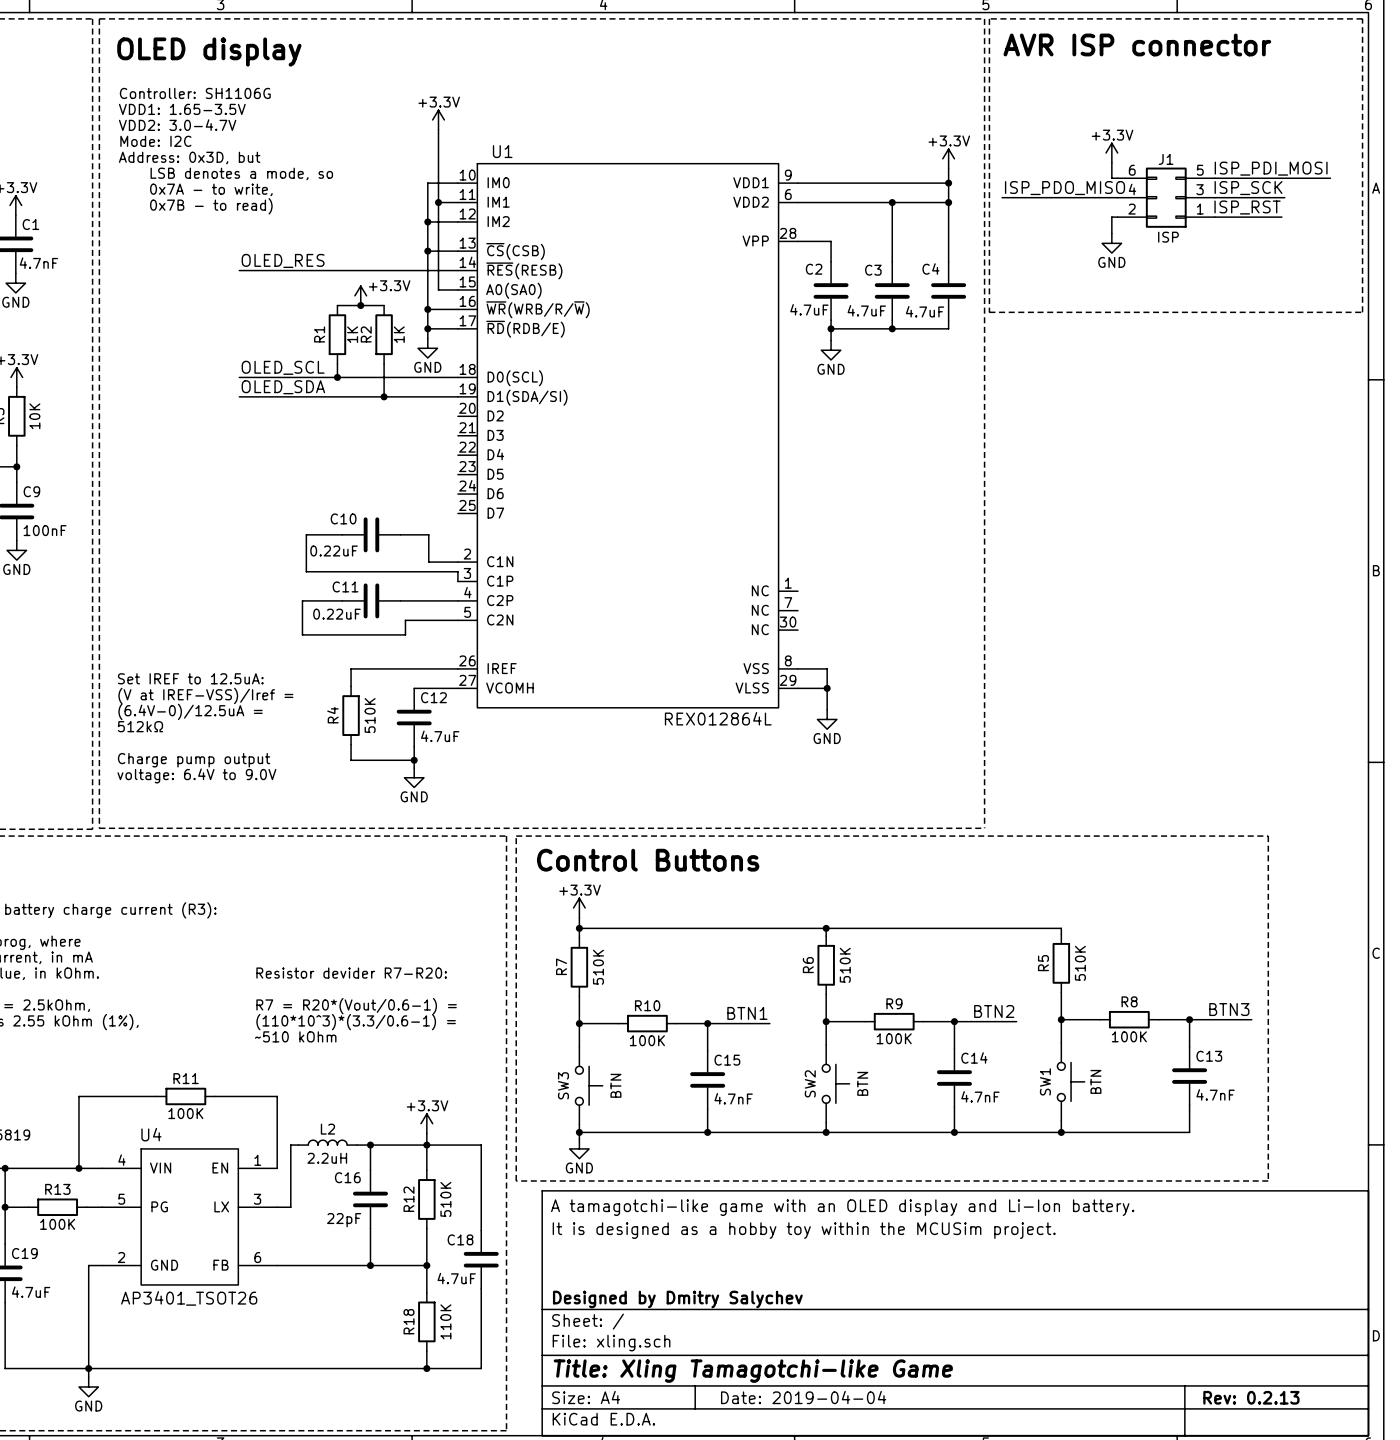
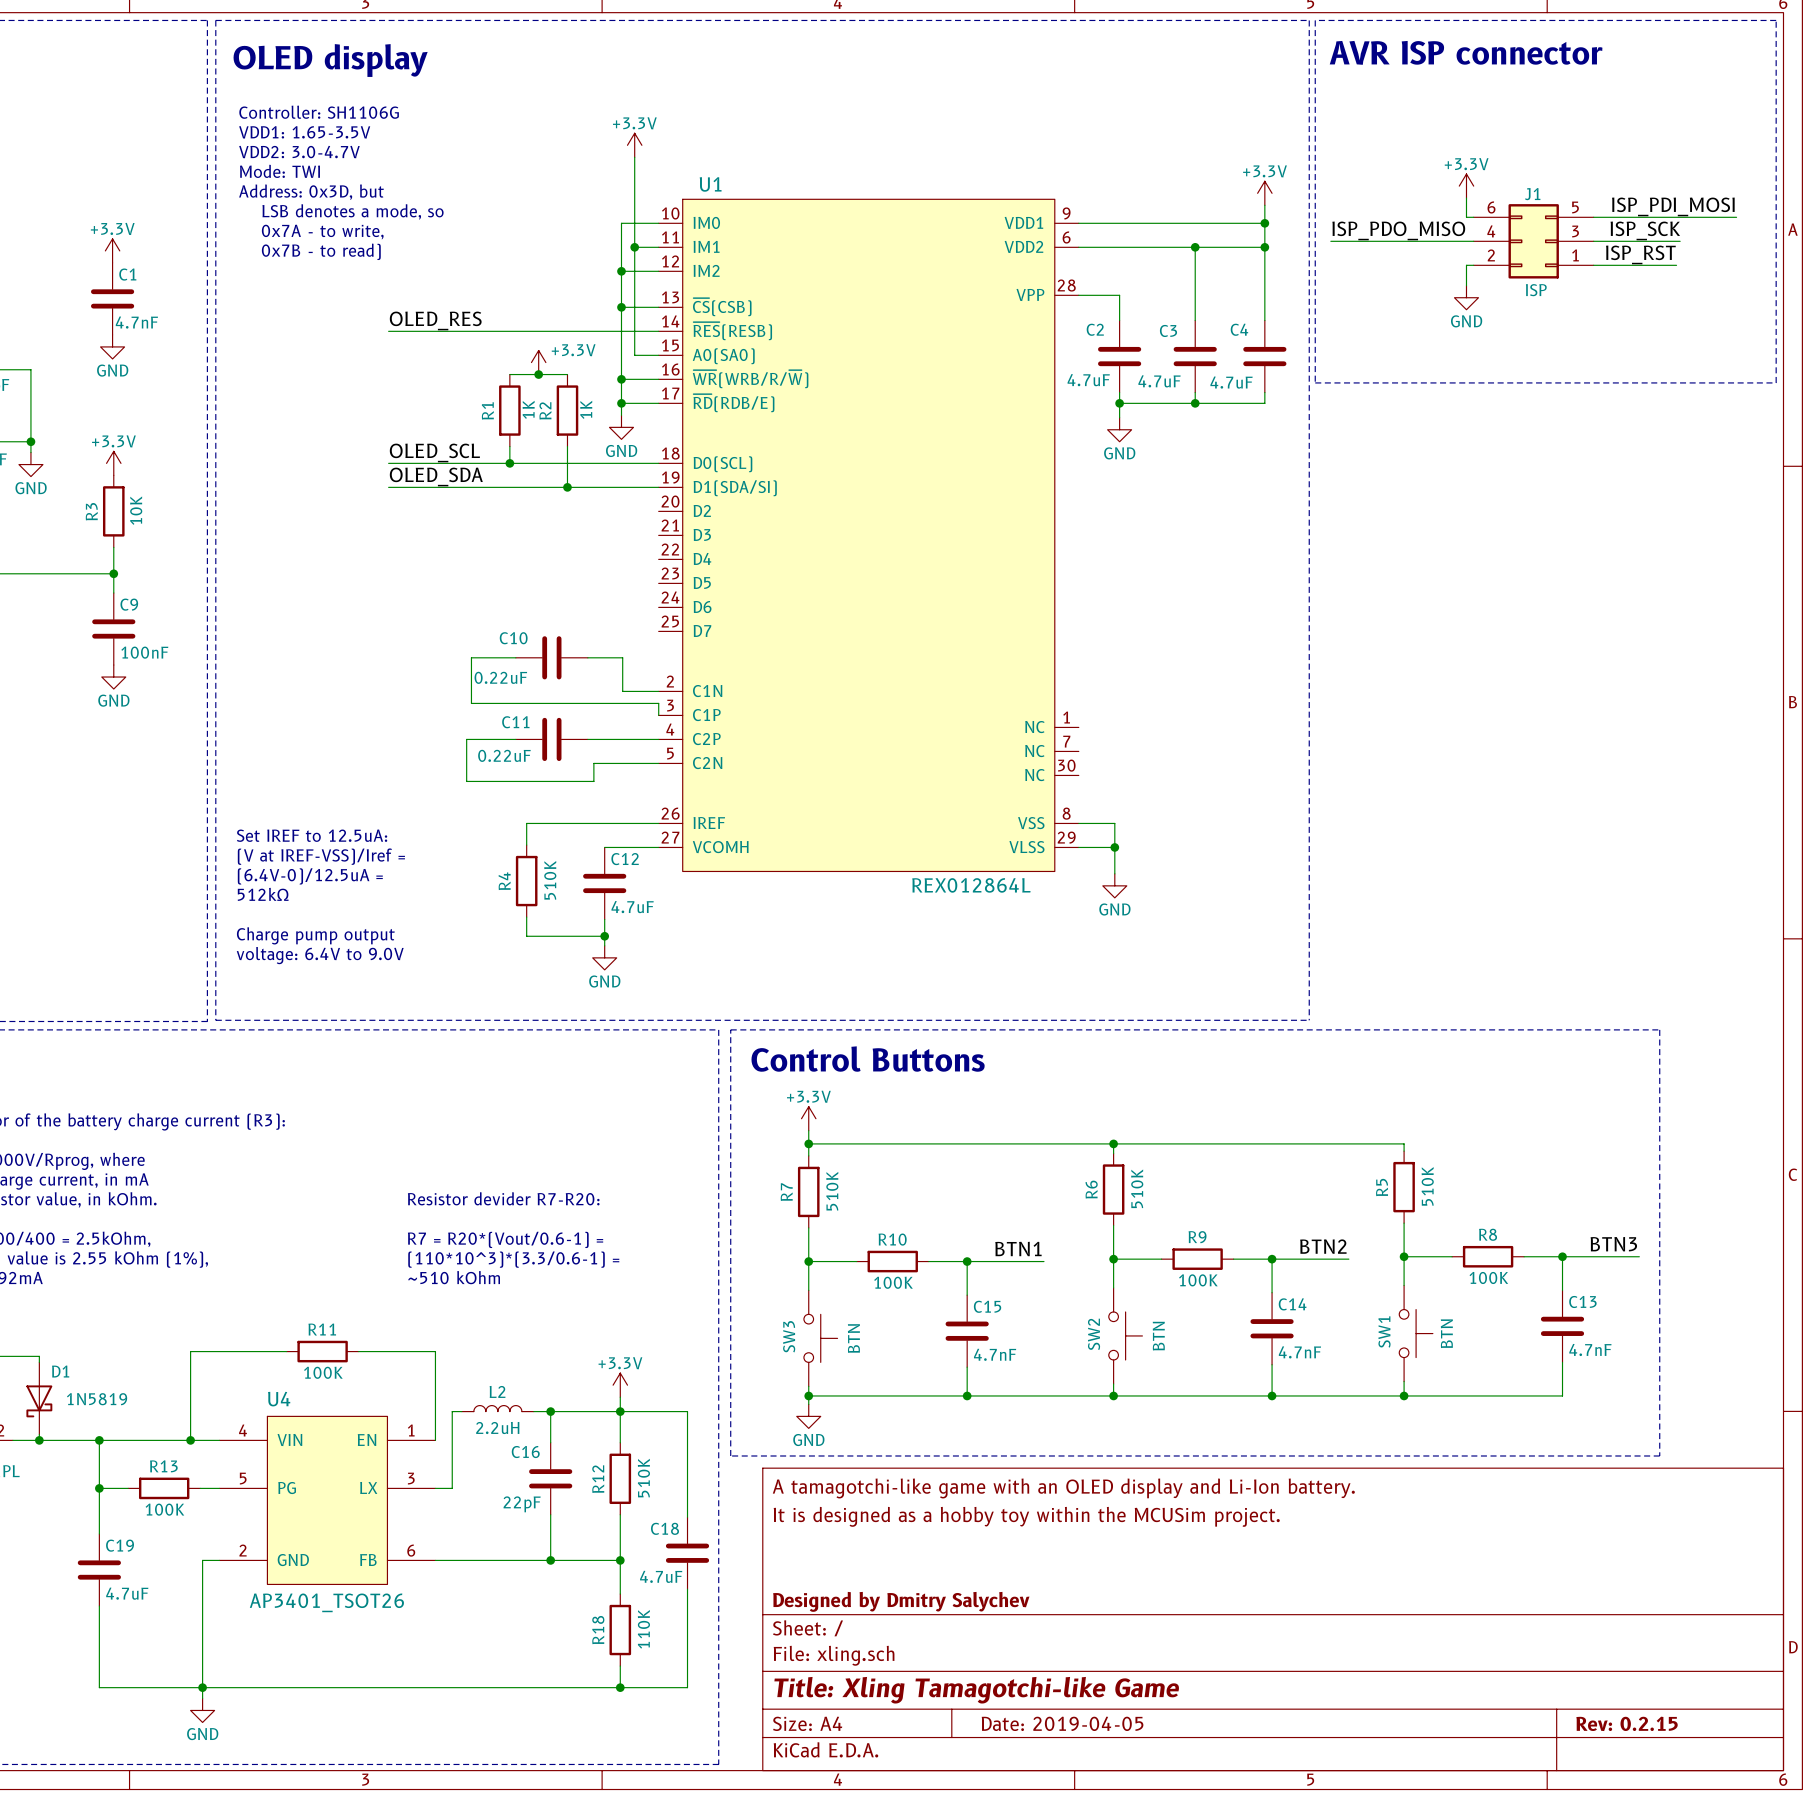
text: Mode: I2C (155, 141) -> Mode: TWI (279, 171)
title block: Date: 2019-04-04 (803, 1397) -> Date: 2019-04-05 (1062, 1723)
title block: Rev: 0.2.13 (1251, 1397) -> Rev: 0.2.15 (1627, 1723)

